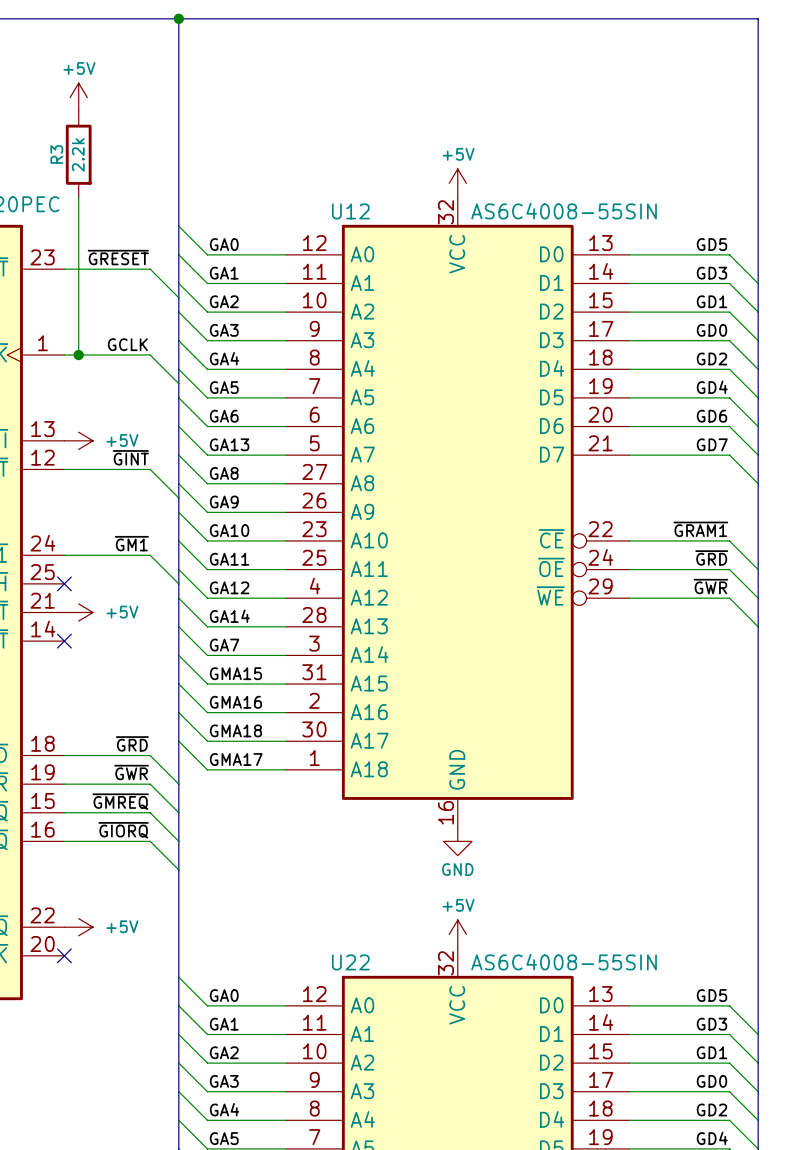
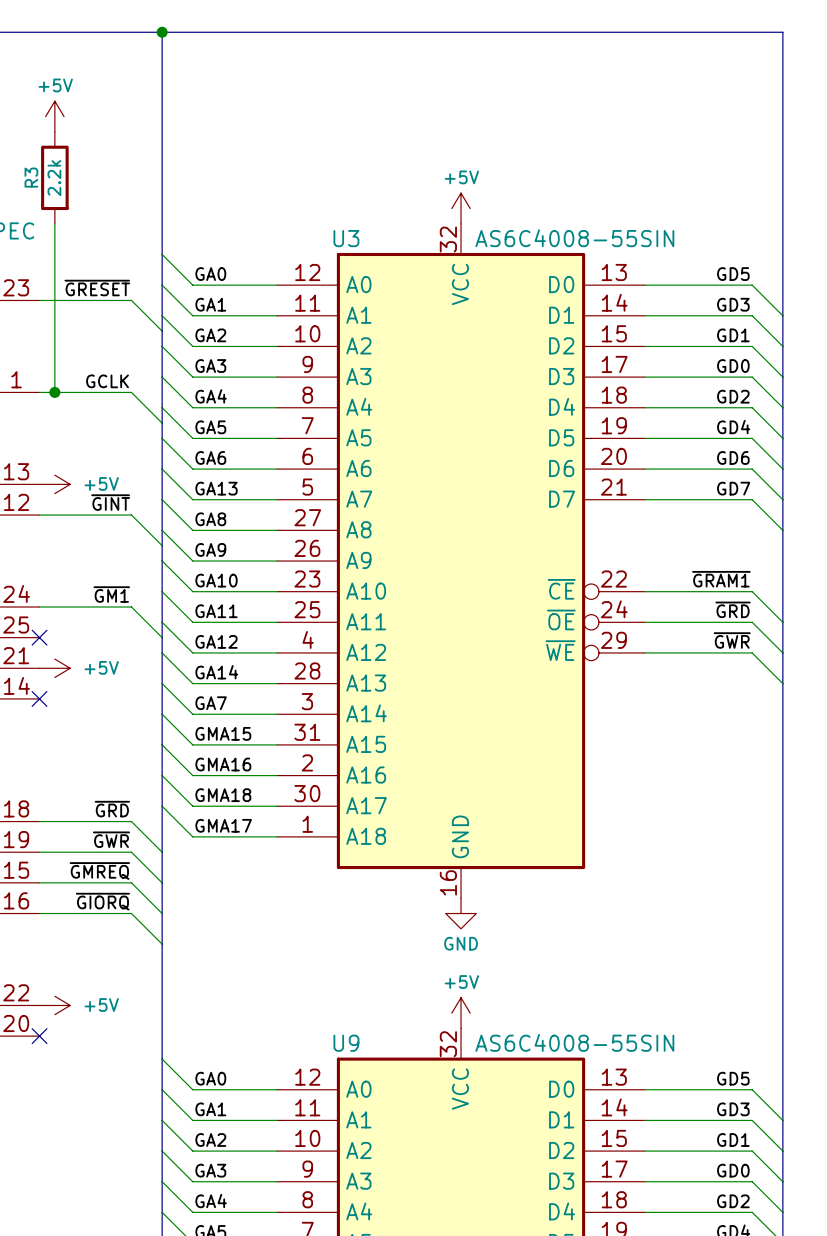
U12 name: U12 (350, 211) -> U3 (346, 238)
U22 name: U22 (350, 962) -> U9 (346, 1043)

